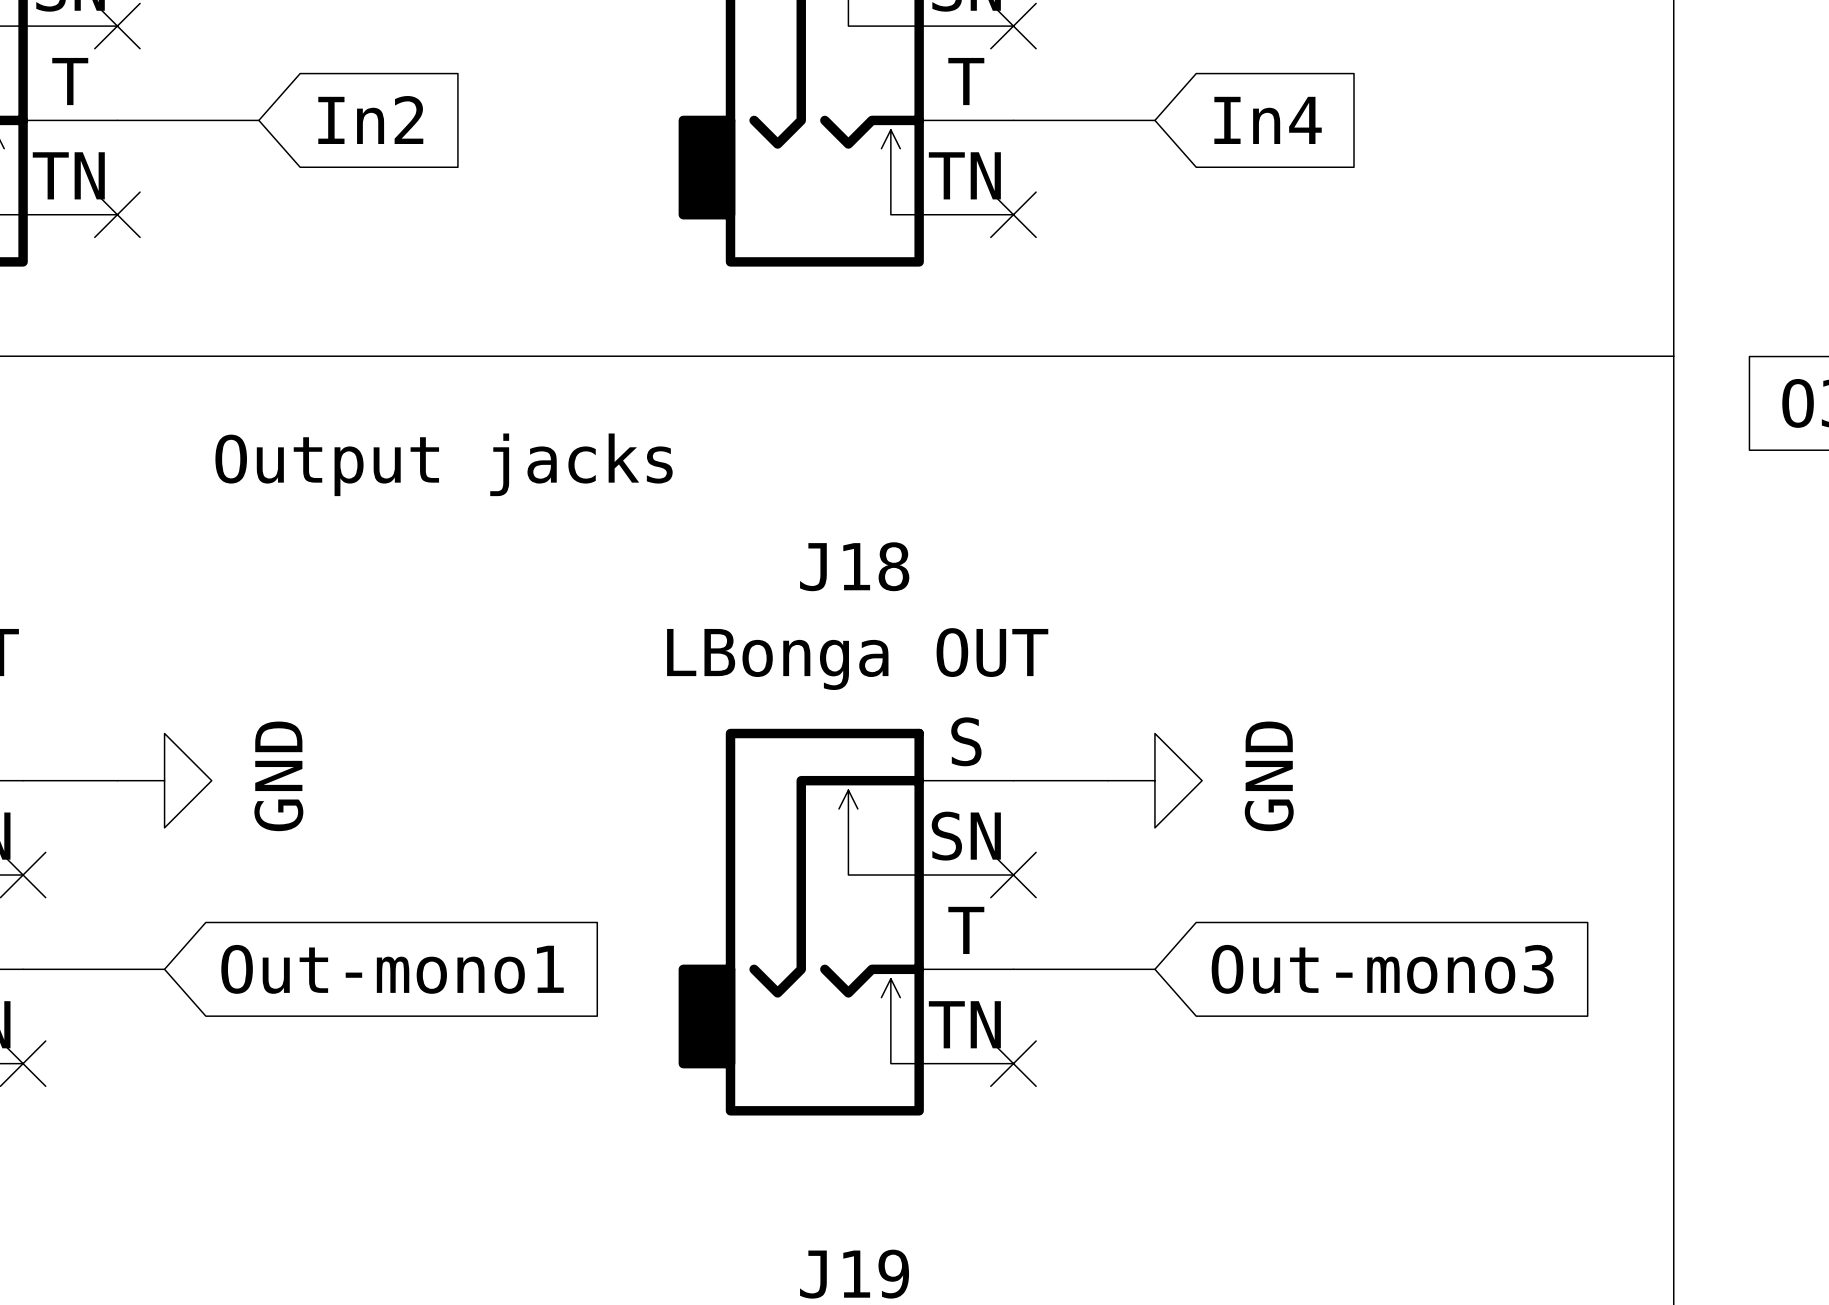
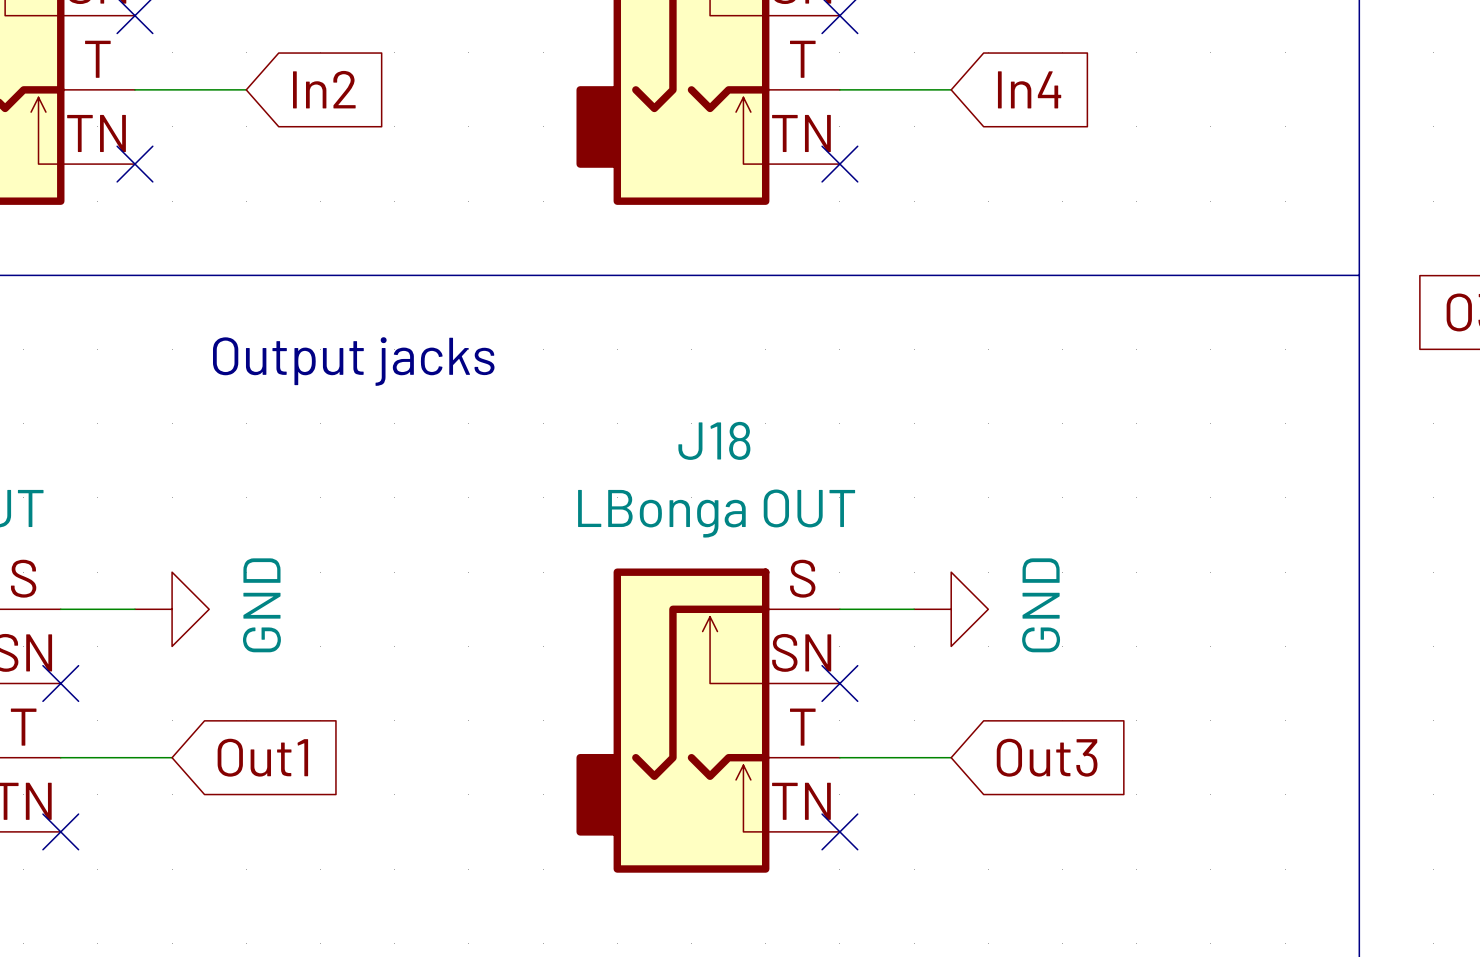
global label: Out-mono1 (392, 969) -> Out1 (262, 757)
global label: Out-mono3 (1382, 969) -> Out3 (1047, 757)

